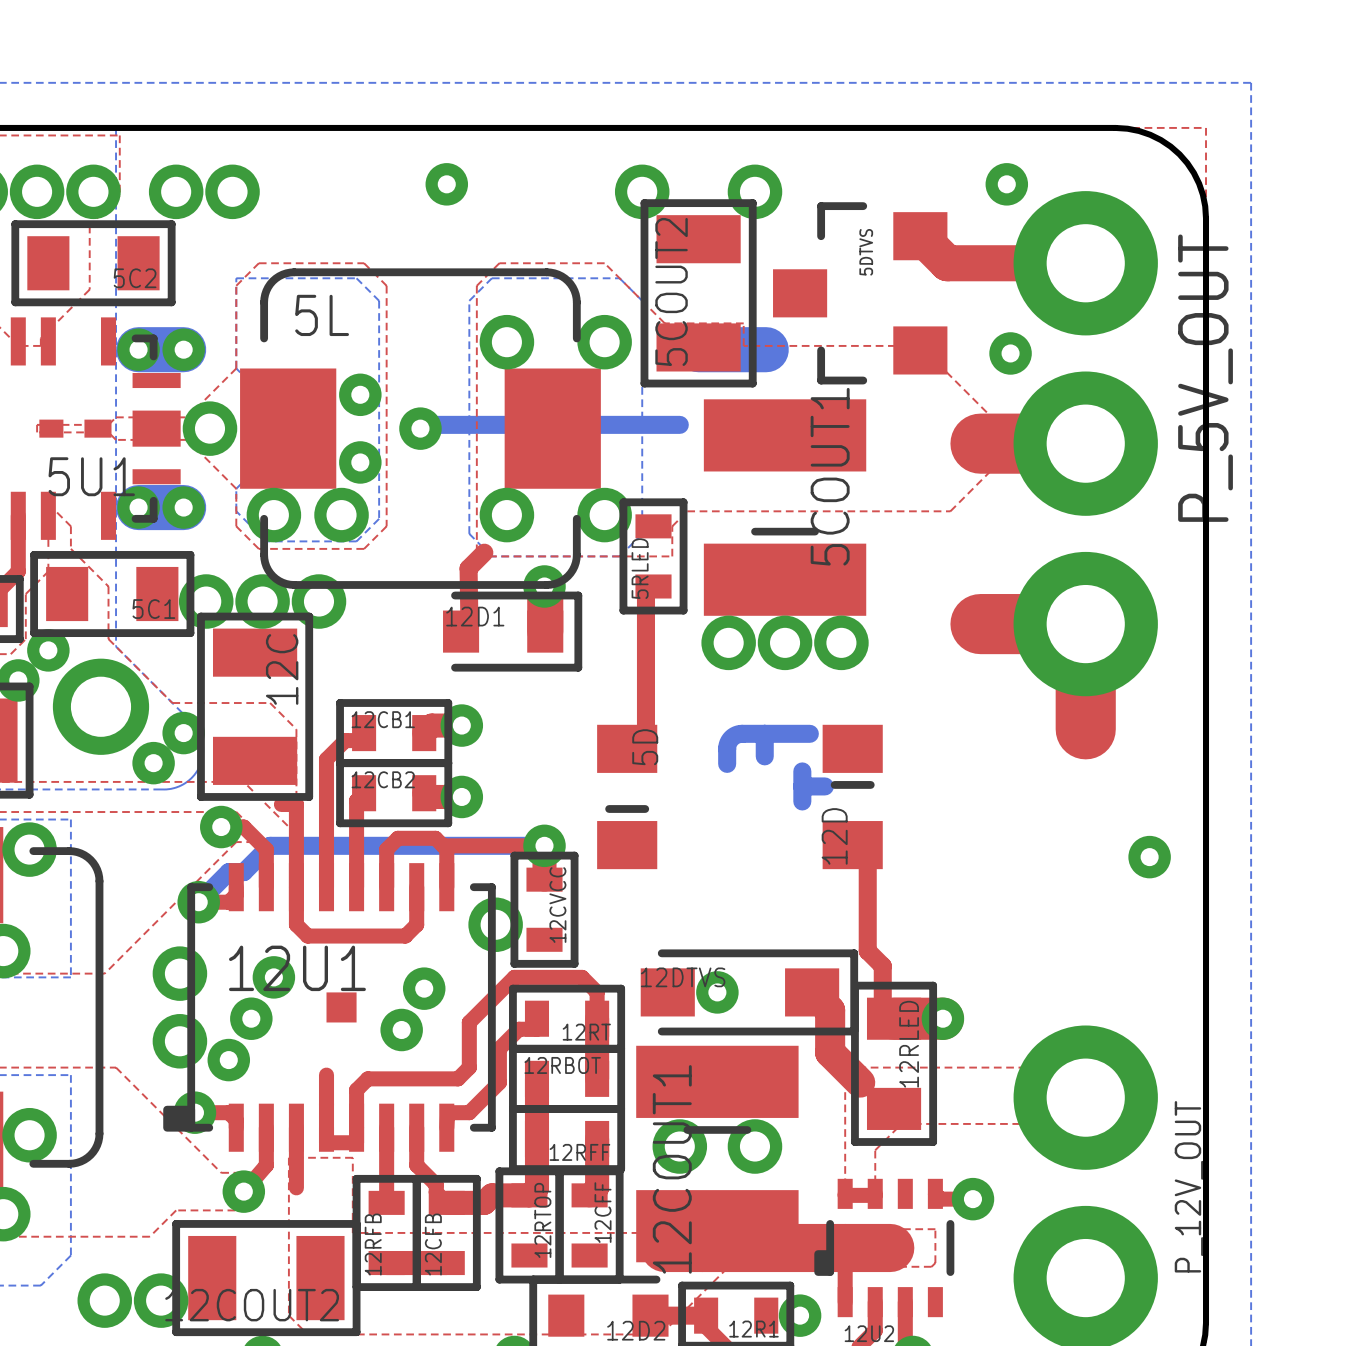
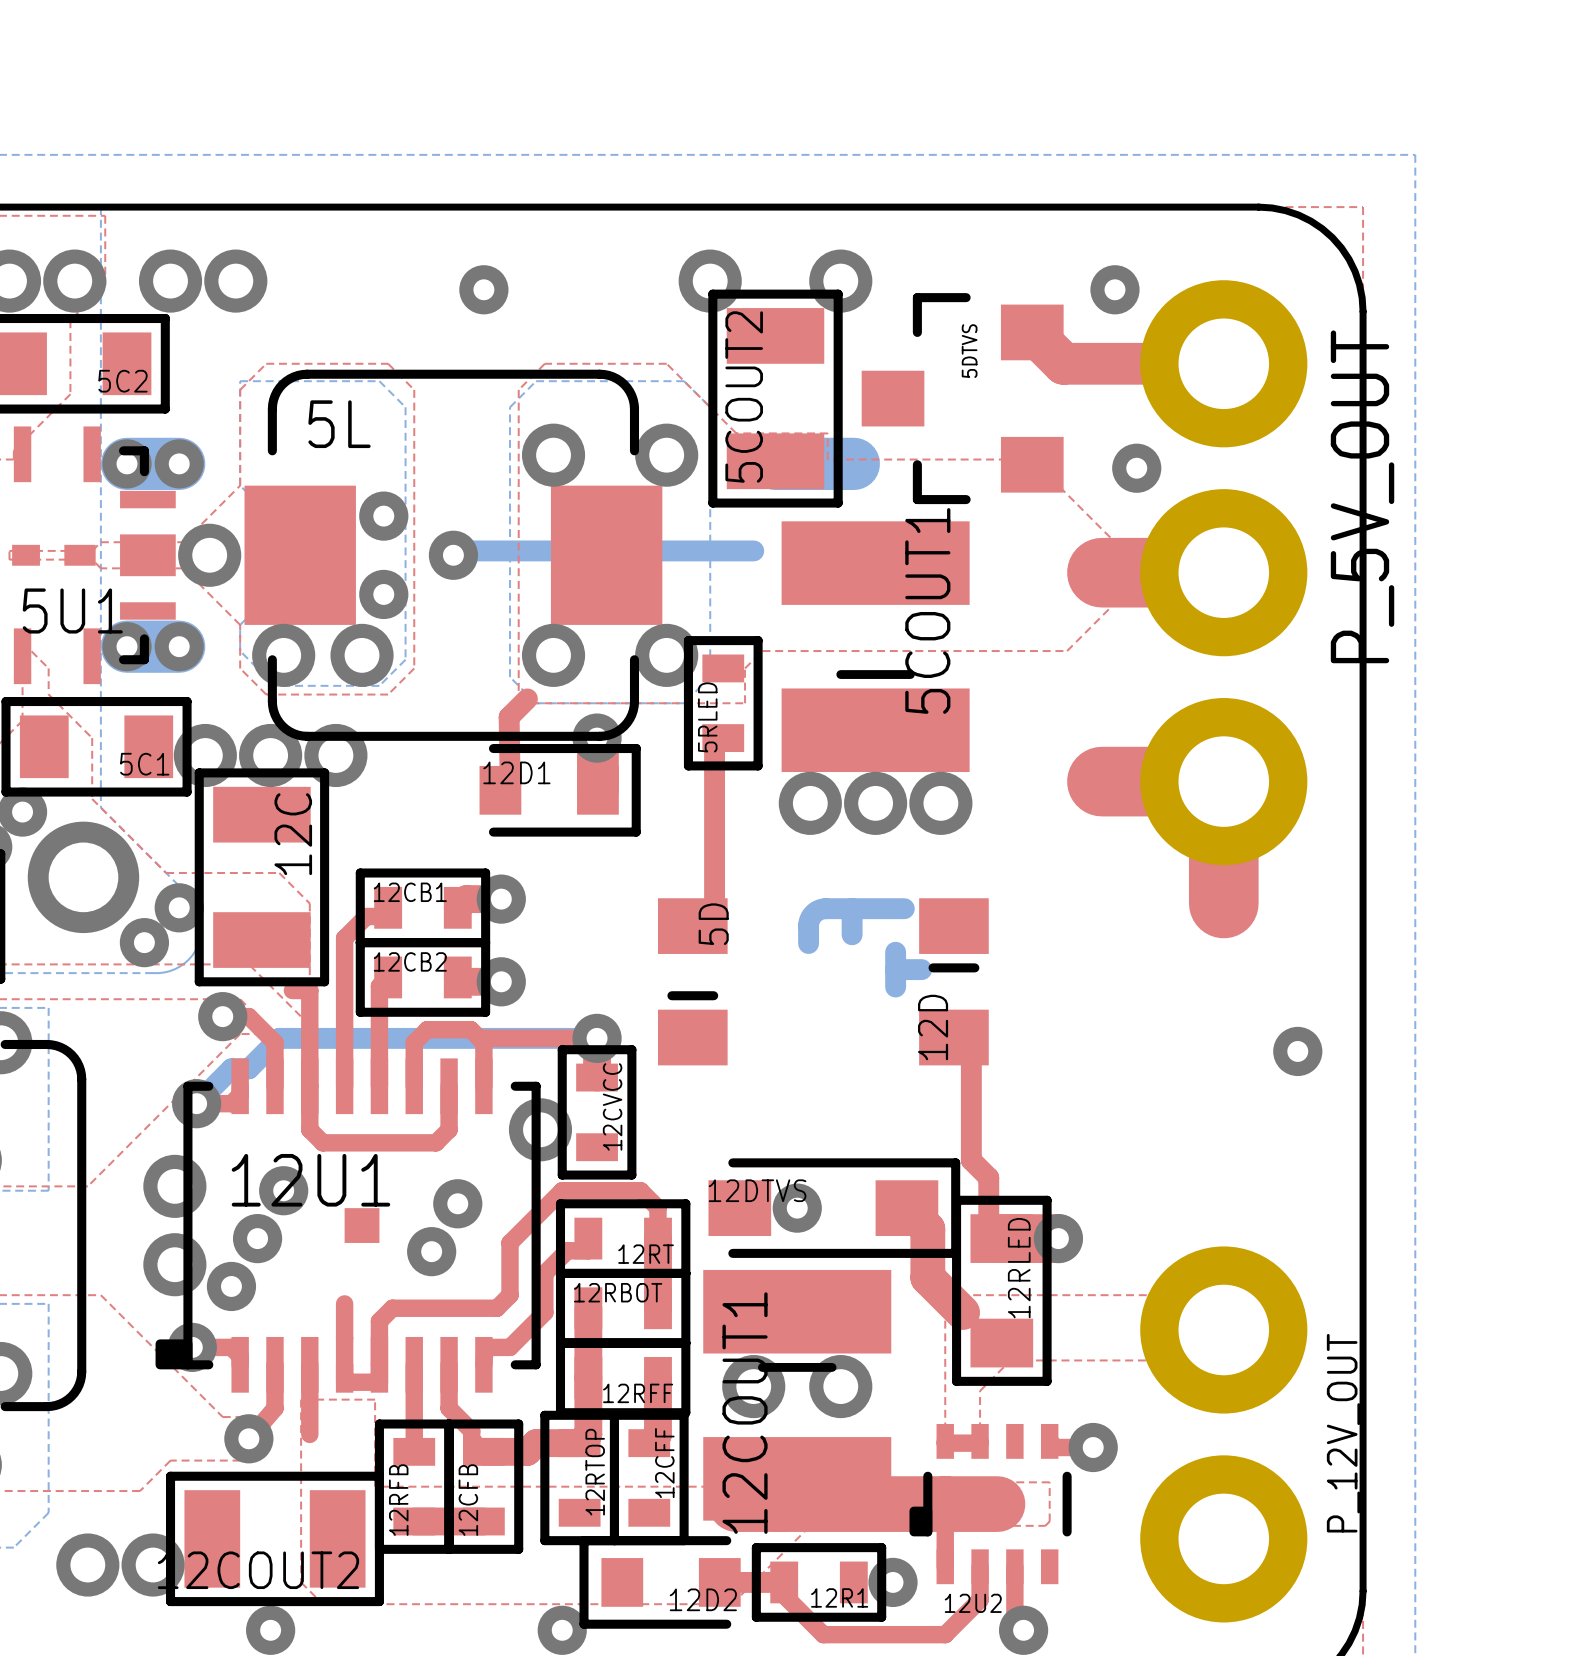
via position: (446, 184) -> (483, 289)
via position: (1006, 184) -> (1114, 289)

